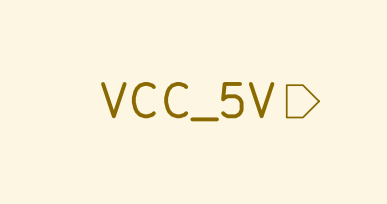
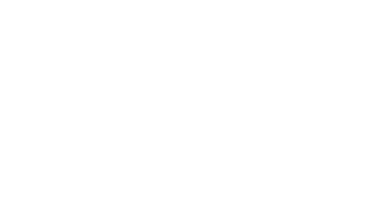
hierarchical label: VCC_5V (187, 101) -> none

